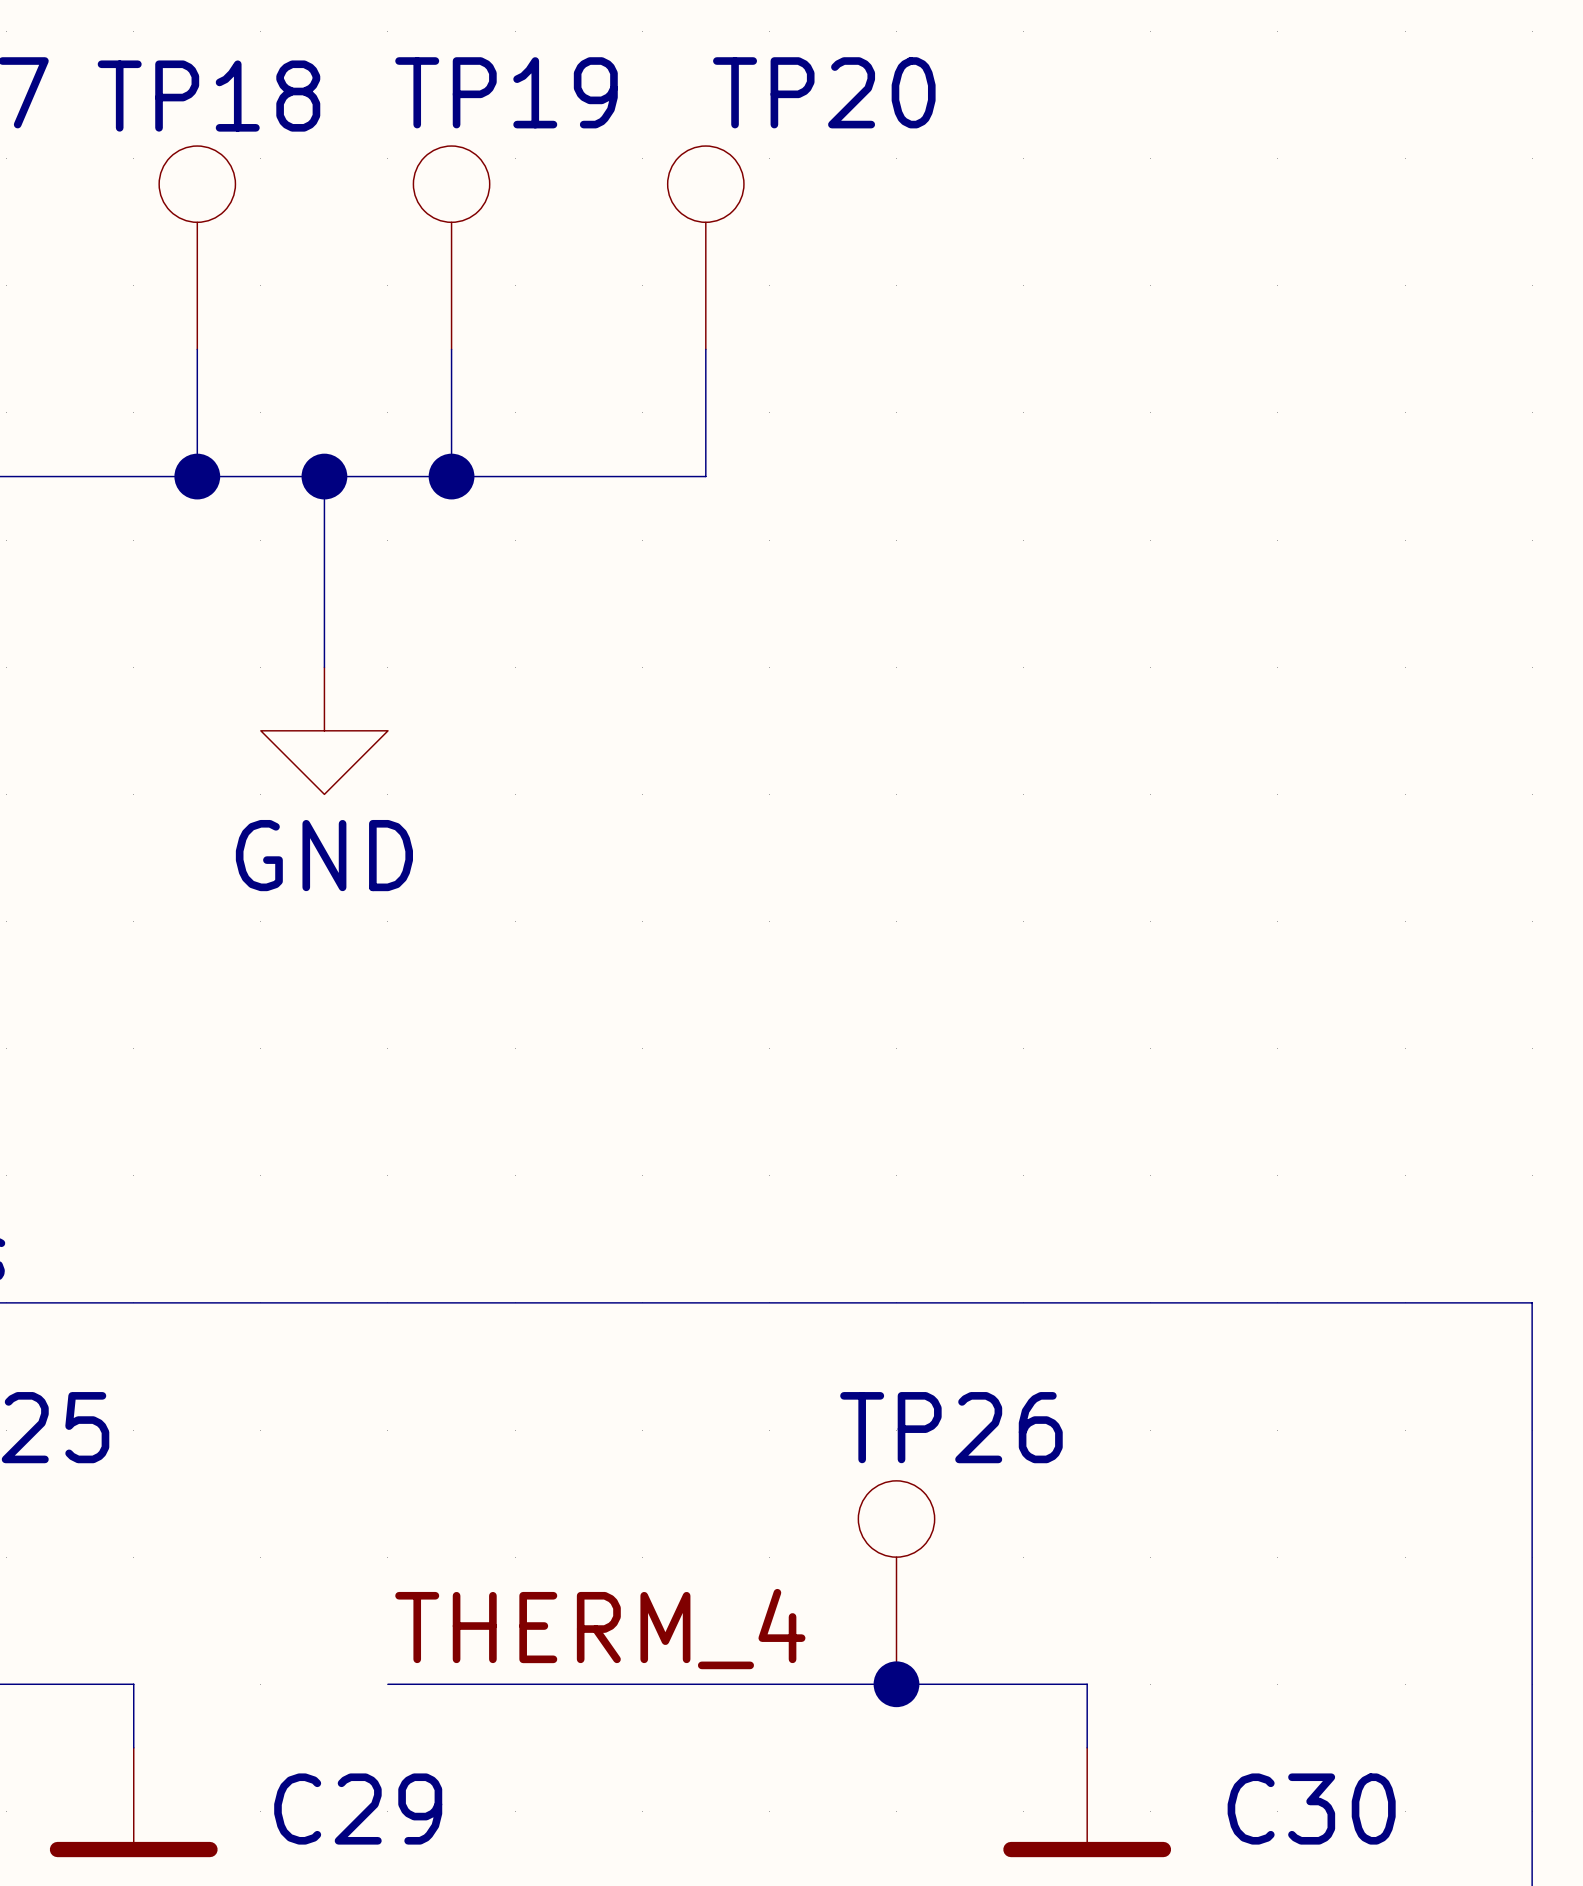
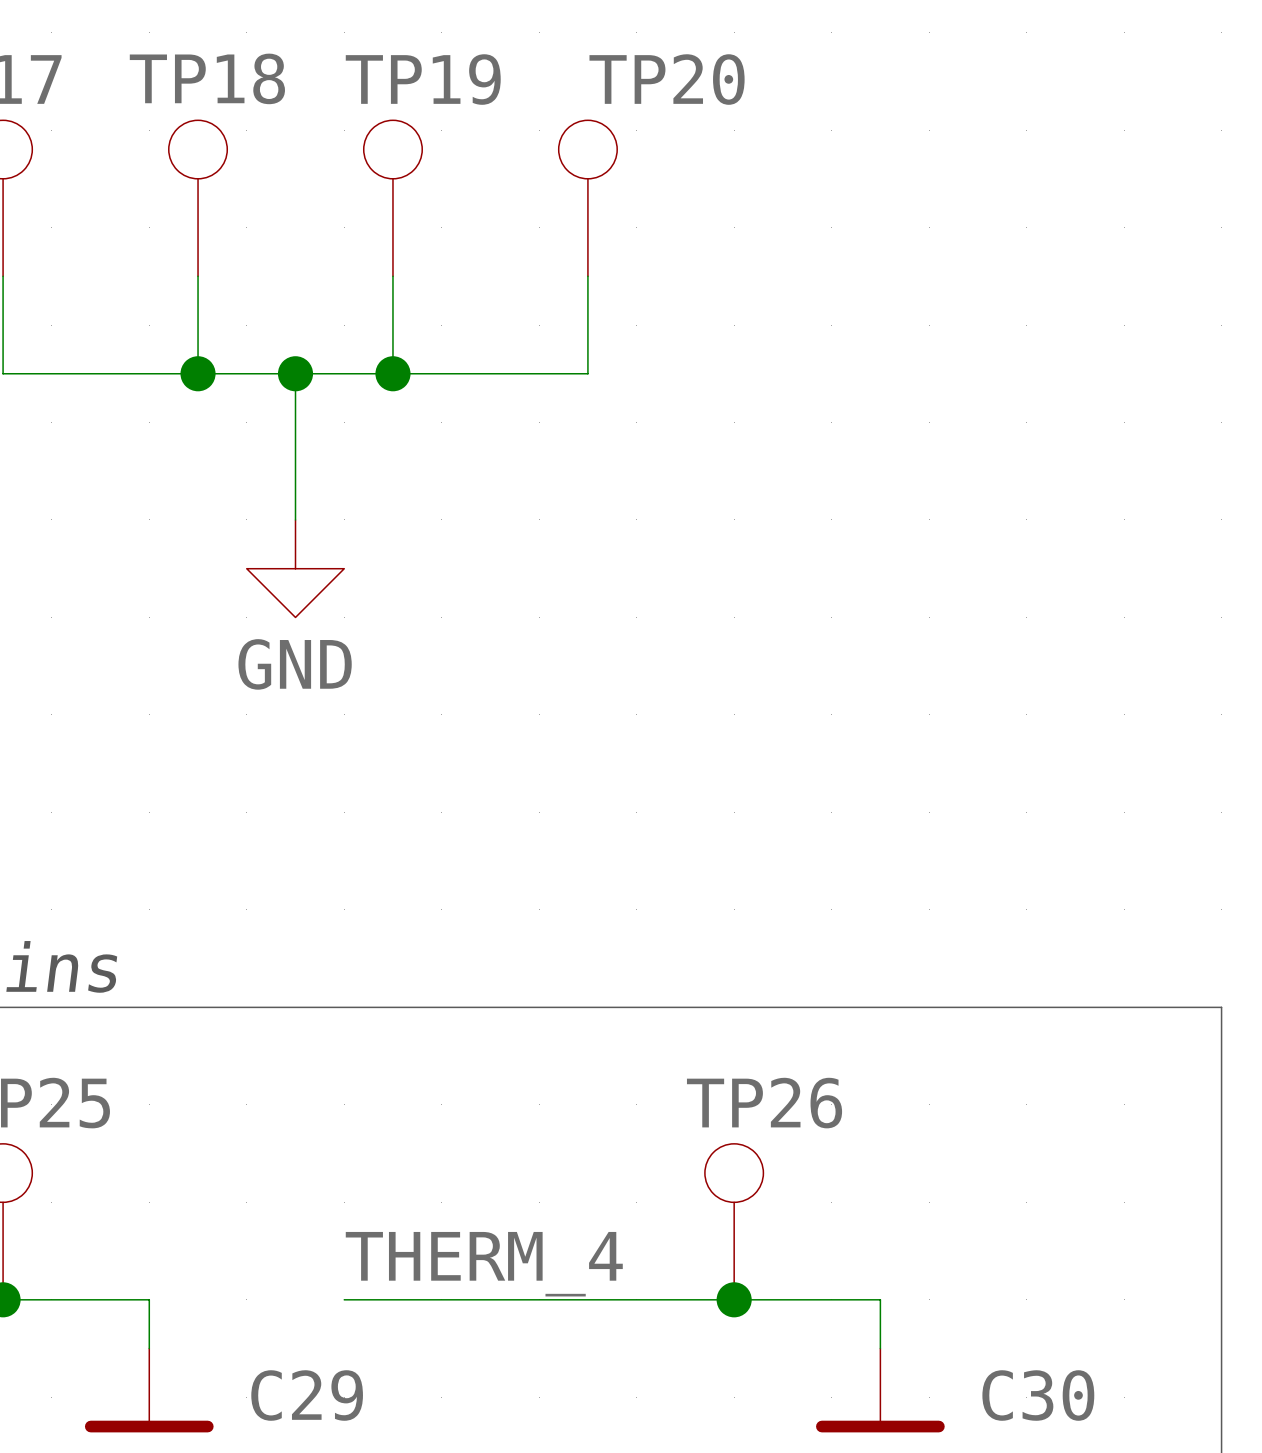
TP18 name position: TP18 (208, 96) -> TP18 (207, 78)

